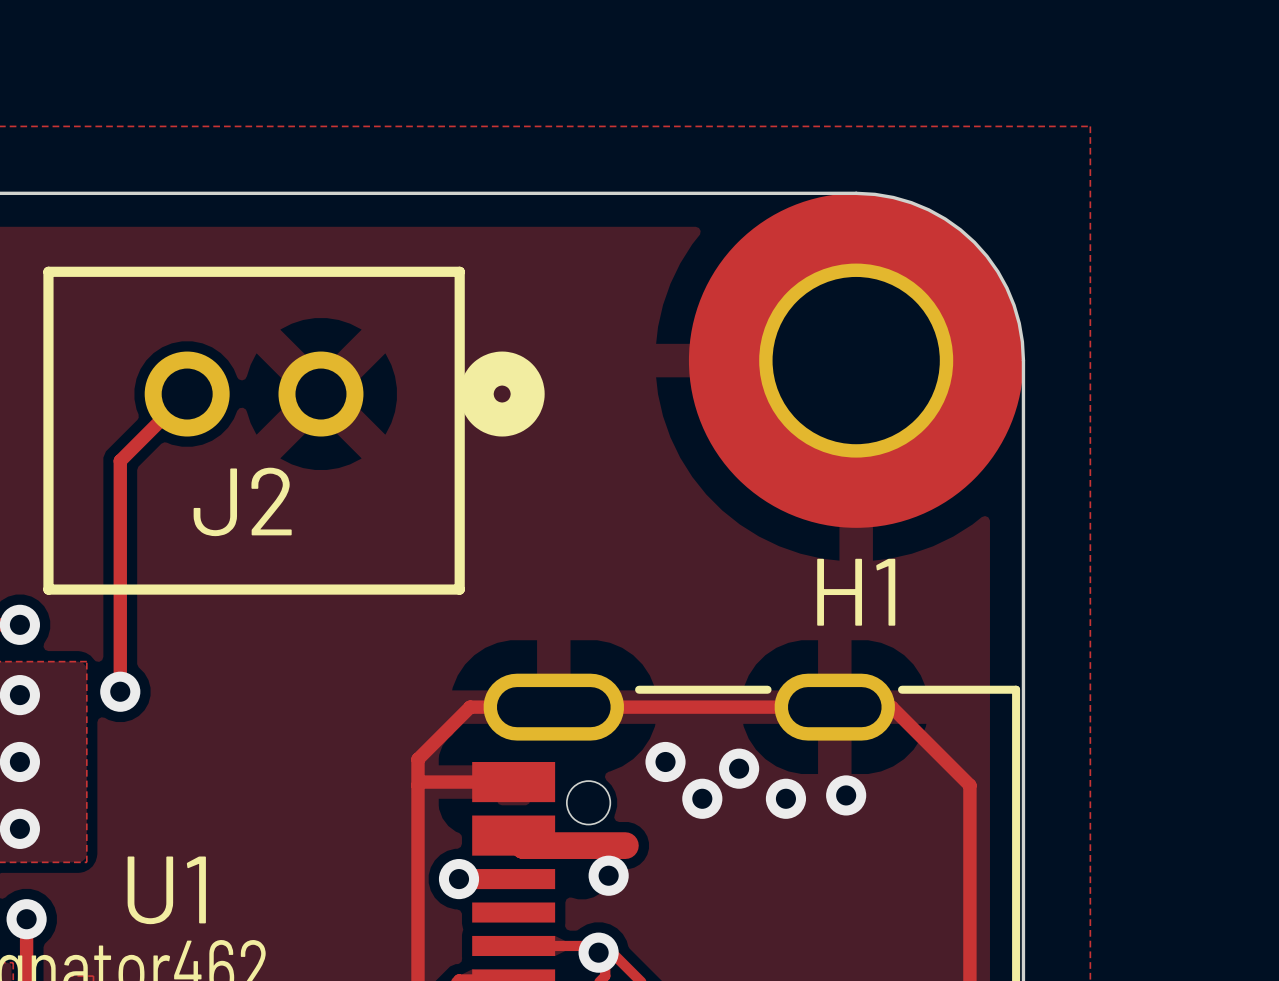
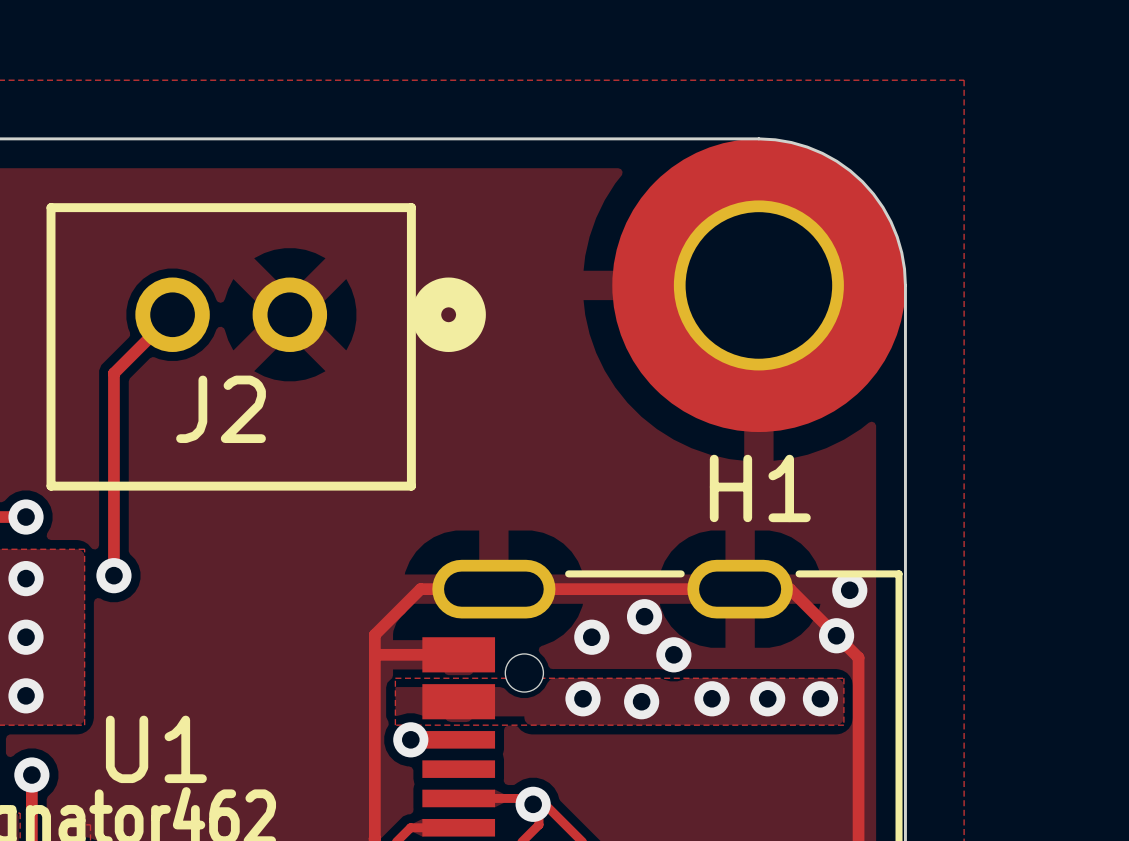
via: none -> (849, 590)
via: none -> (644, 616)
via: none -> (836, 635)
via: (739, 768) -> none
via: none -> (673, 654)
via position: (846, 795) -> (767, 698)
via position: (702, 798) -> (641, 701)
via: (785, 798) -> none
zone outline: none -> (395, 678) (843, 678) (843, 725) (395, 725) (395, 678)
via: none -> (583, 698)
via: none -> (711, 698)
via: none -> (820, 698)
track: (513, 835) (523, 845) (625, 845) -> none
via: (608, 875) -> none

